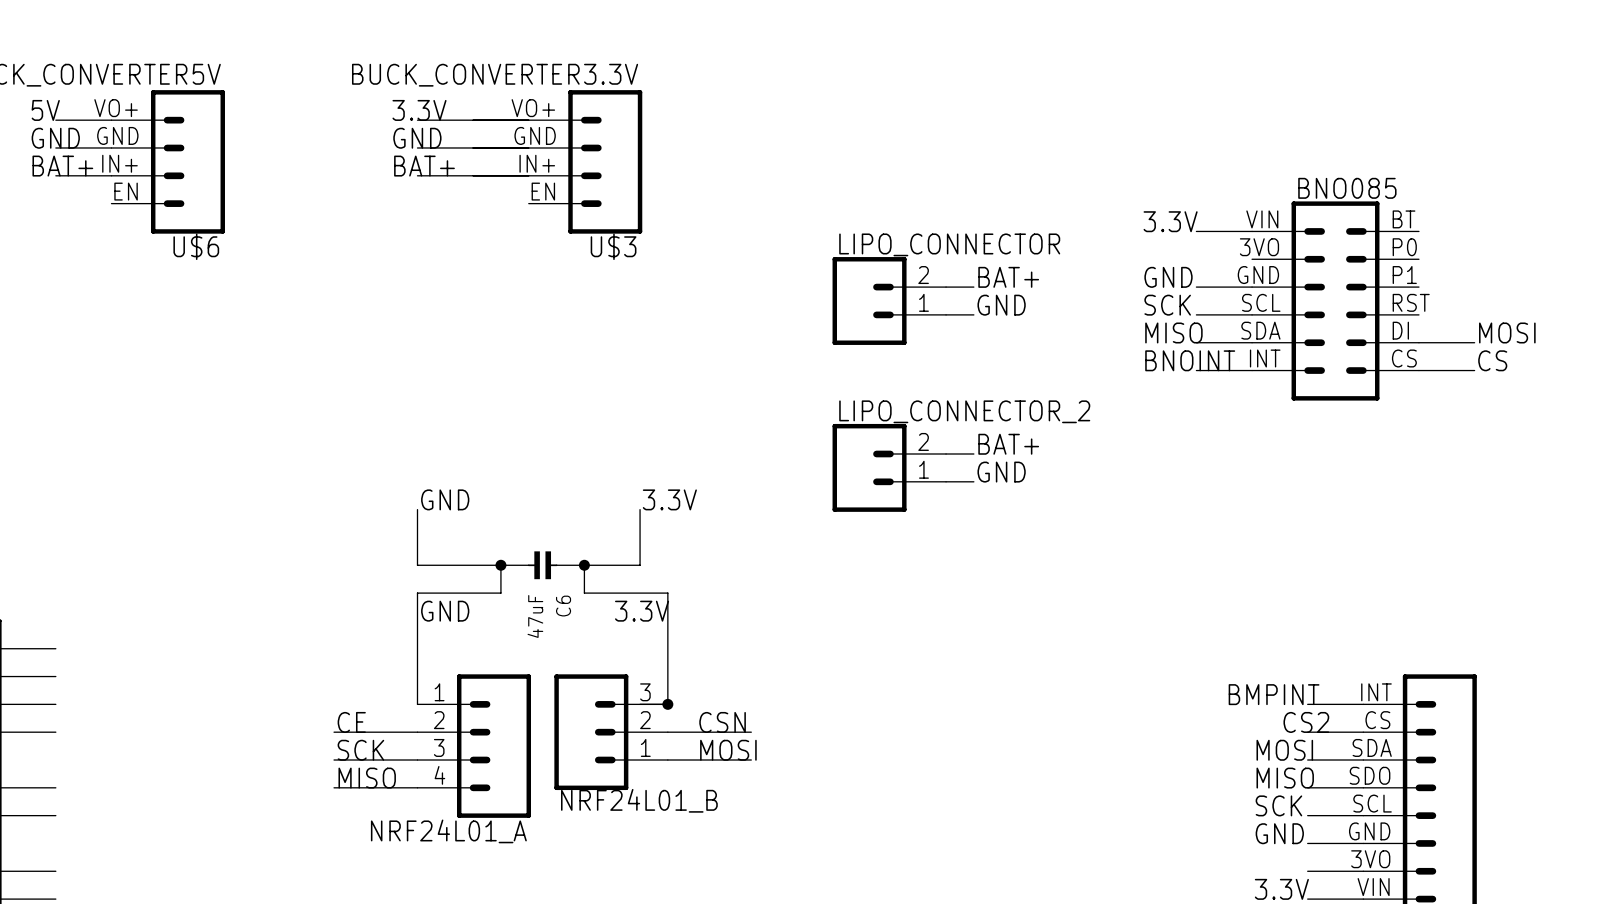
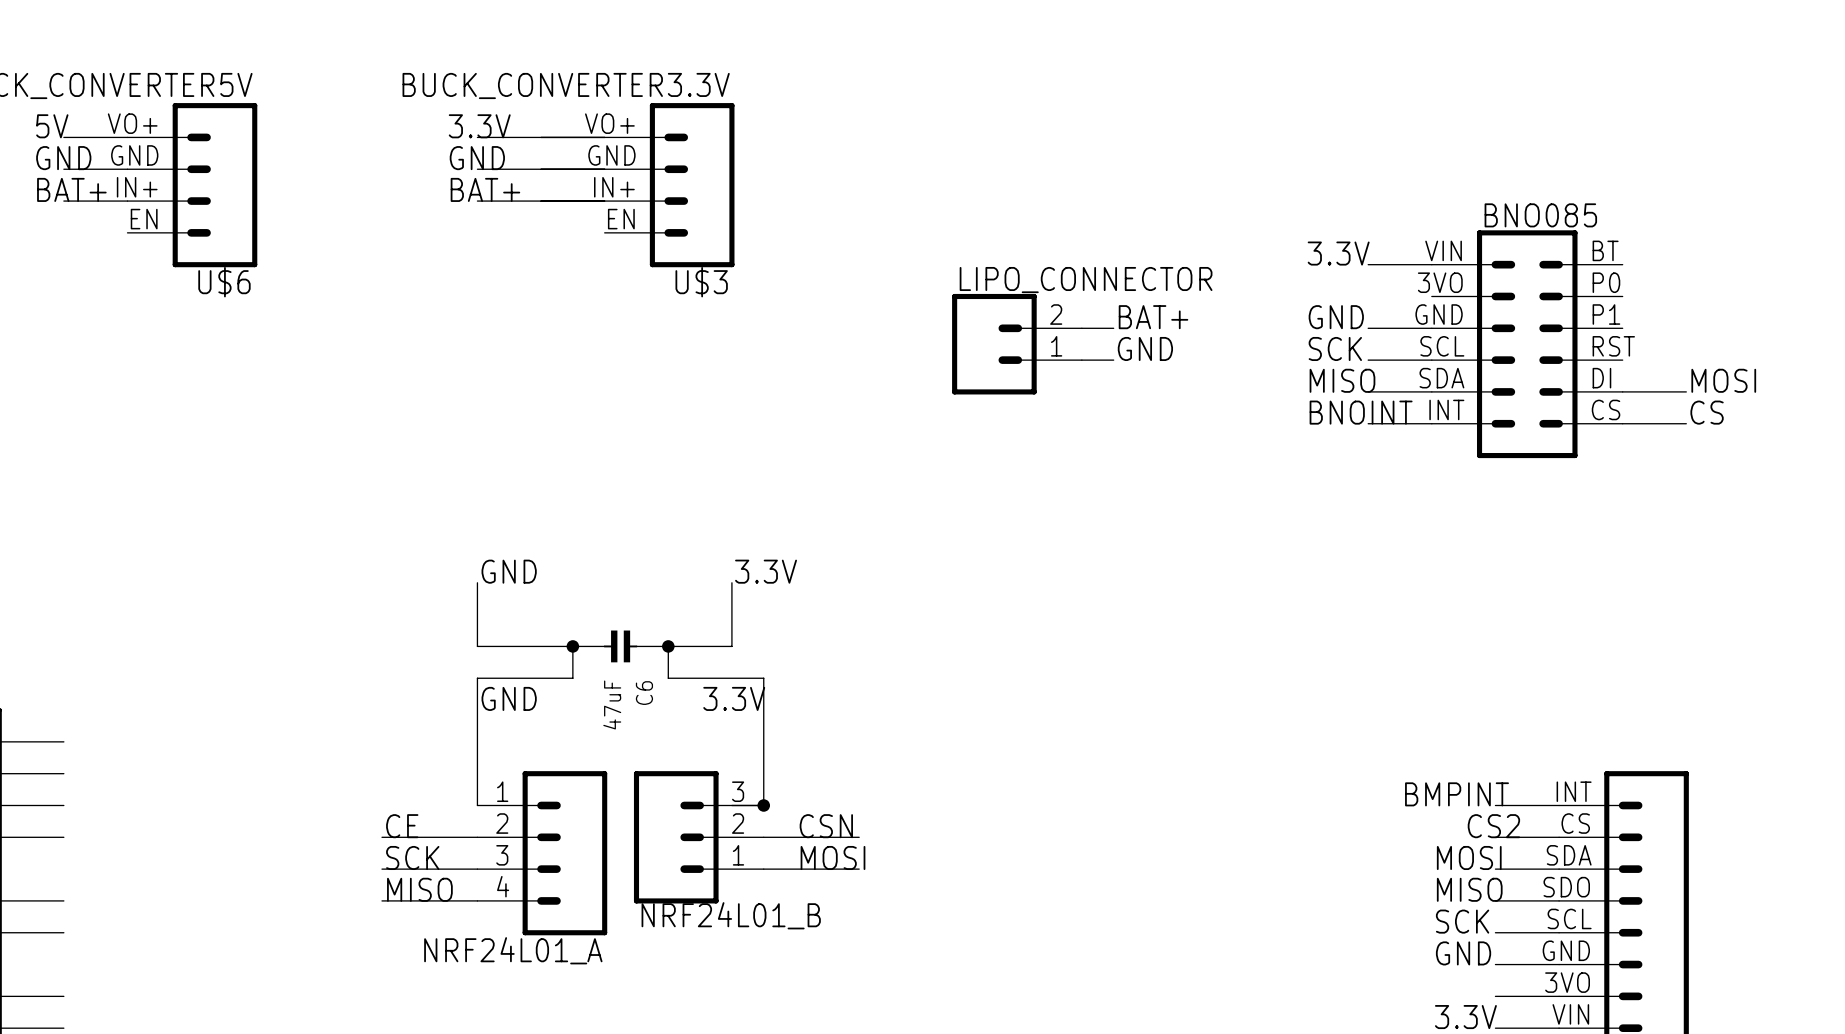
label: BAT+ (1008, 444) -> none
wire: (946, 453) (973, 453) -> none
LIPO_CONNECTOR_2: (889, 467) -> none
label: GND (1001, 472) -> none
wire: (946, 481) (973, 481) -> none

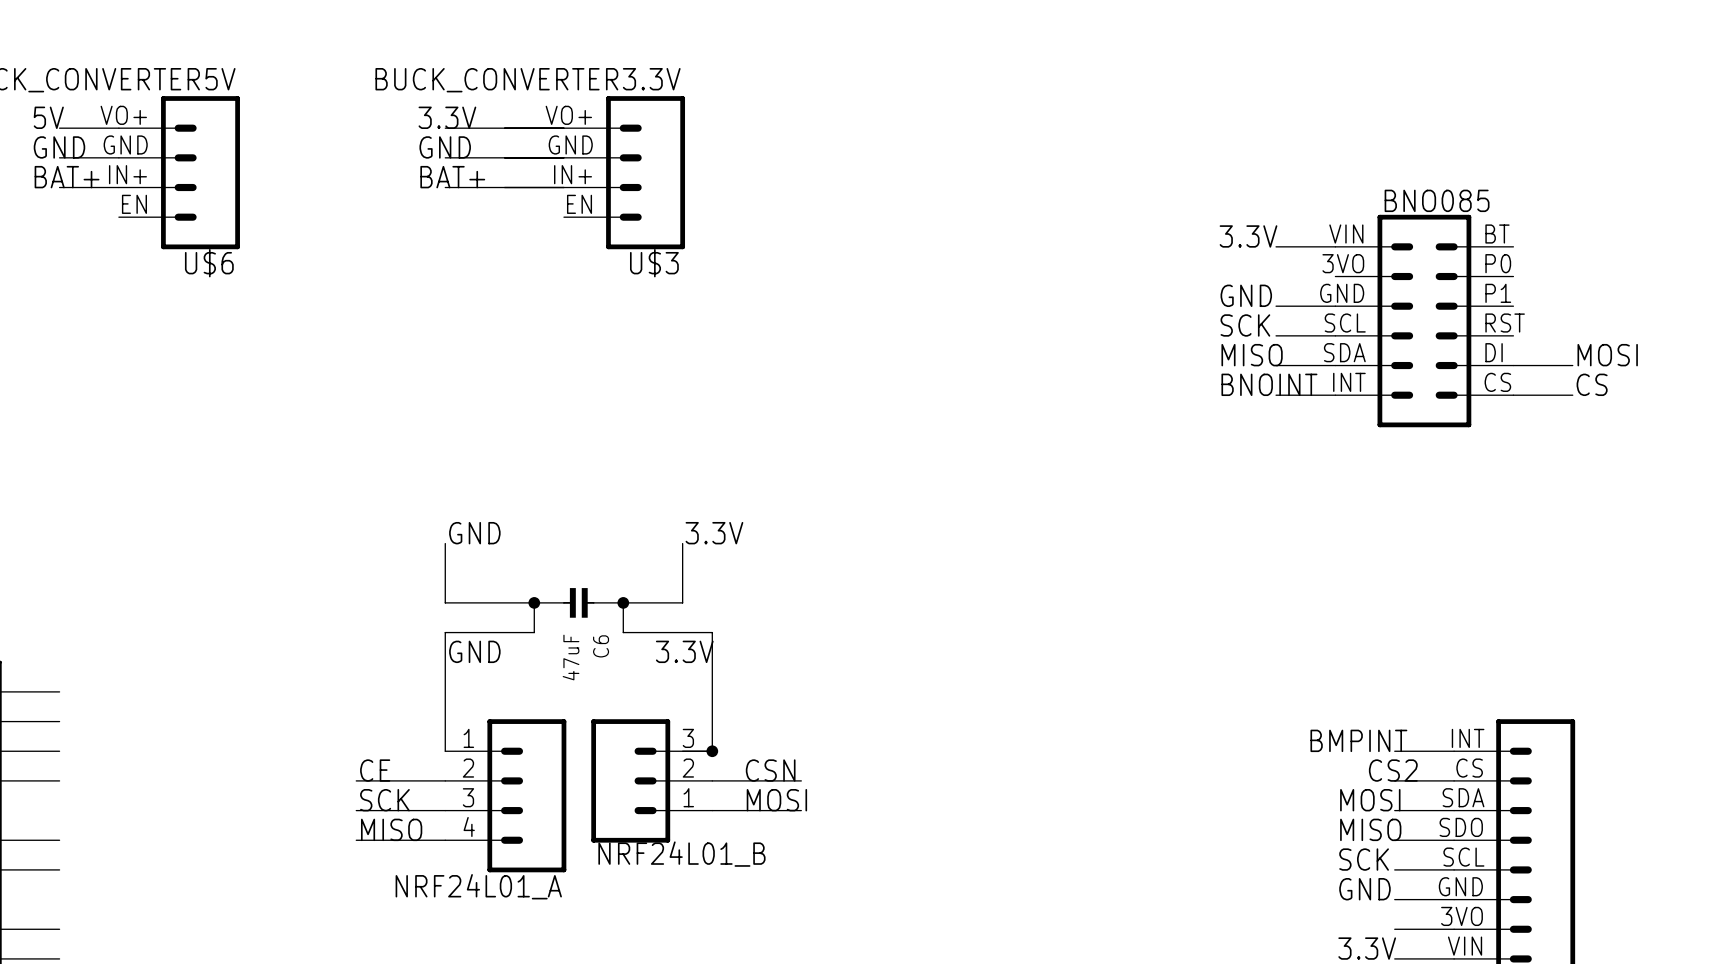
label: BAT+ (1153, 317) -> none
wire: (1081, 328) (1113, 328) -> none
LIPO_CONNECTOR: (1016, 344) -> none
label: GND (1145, 348) -> none
wire: (1081, 360) (1113, 360) -> none

